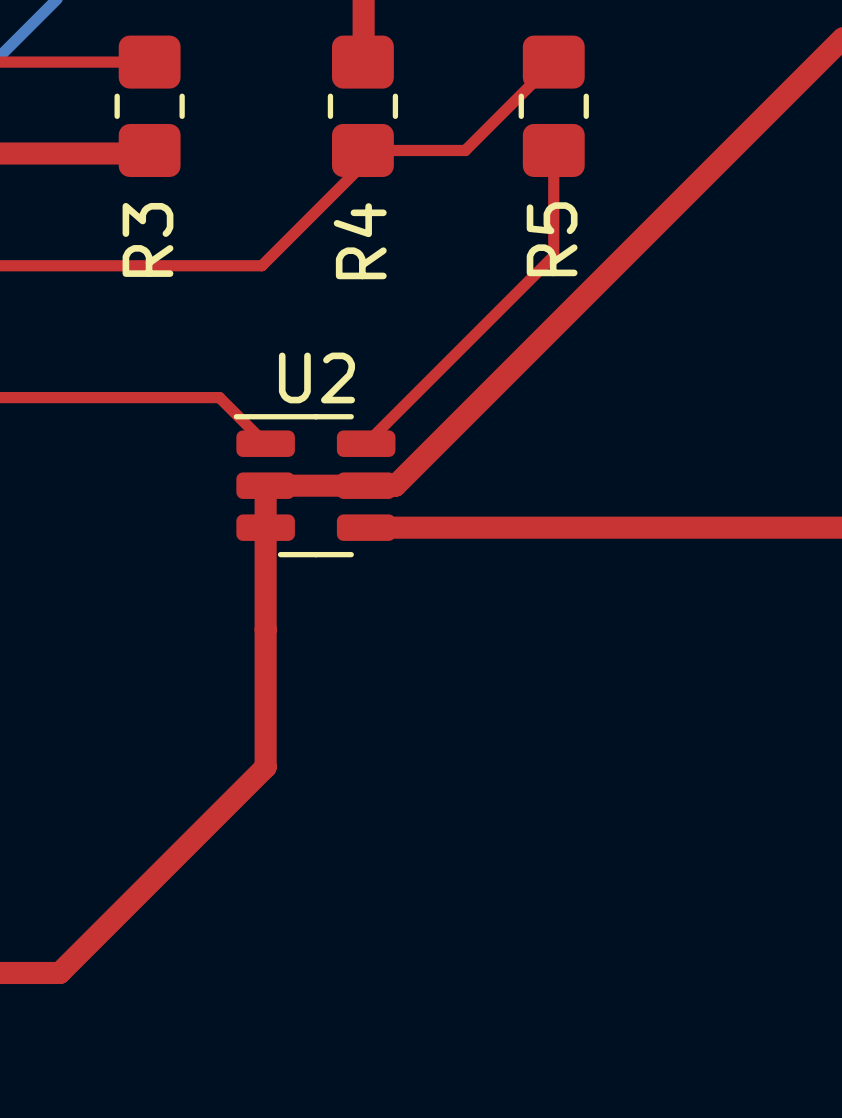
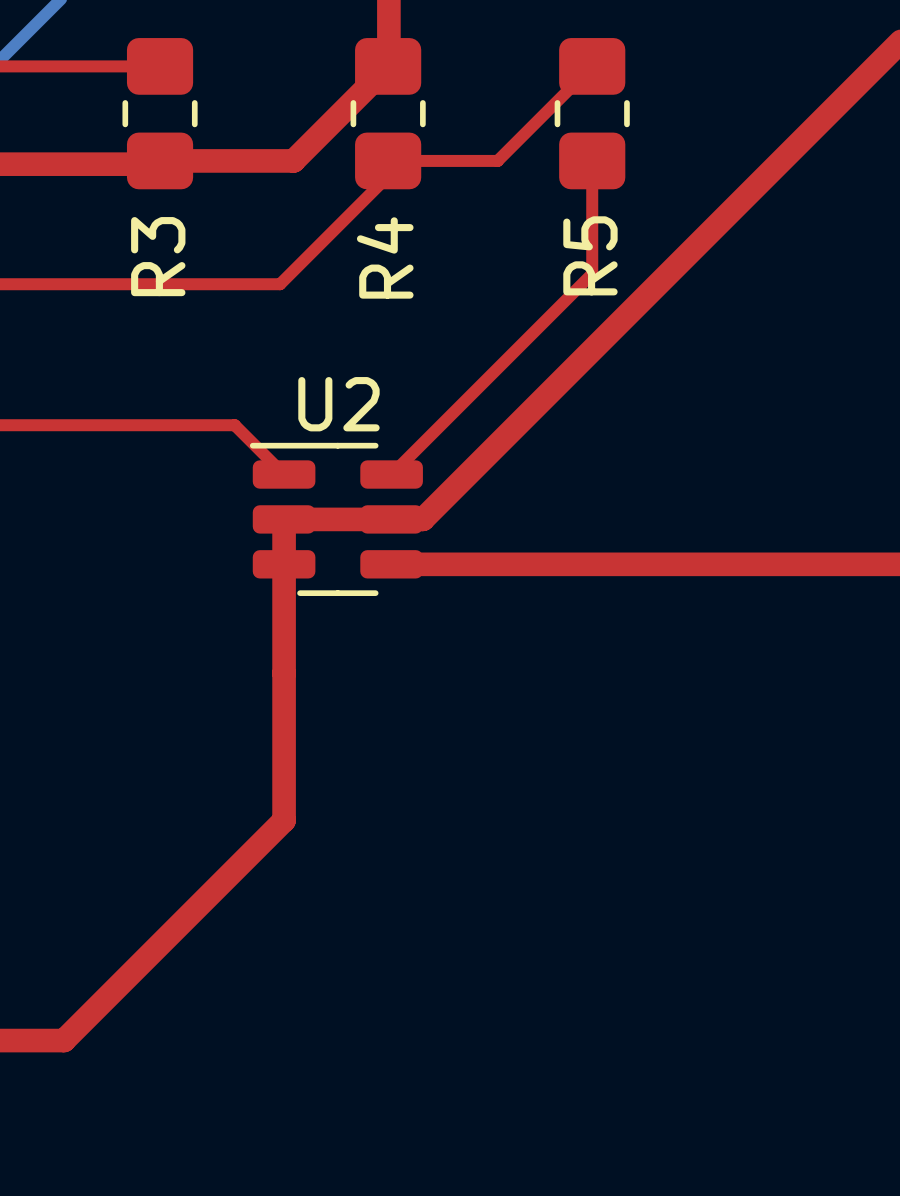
top track: none -> (388, 66) (293, 160) (160, 160)

